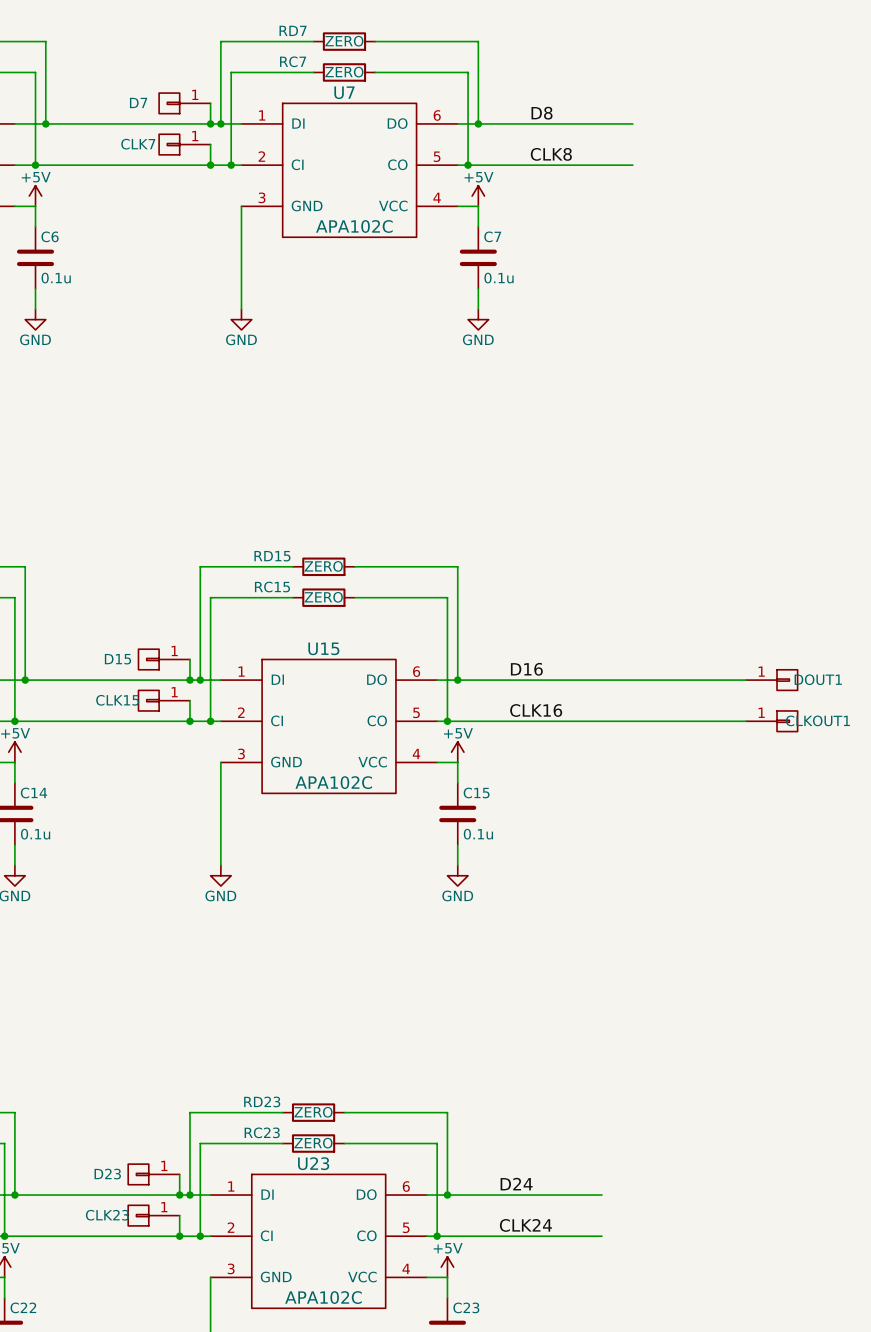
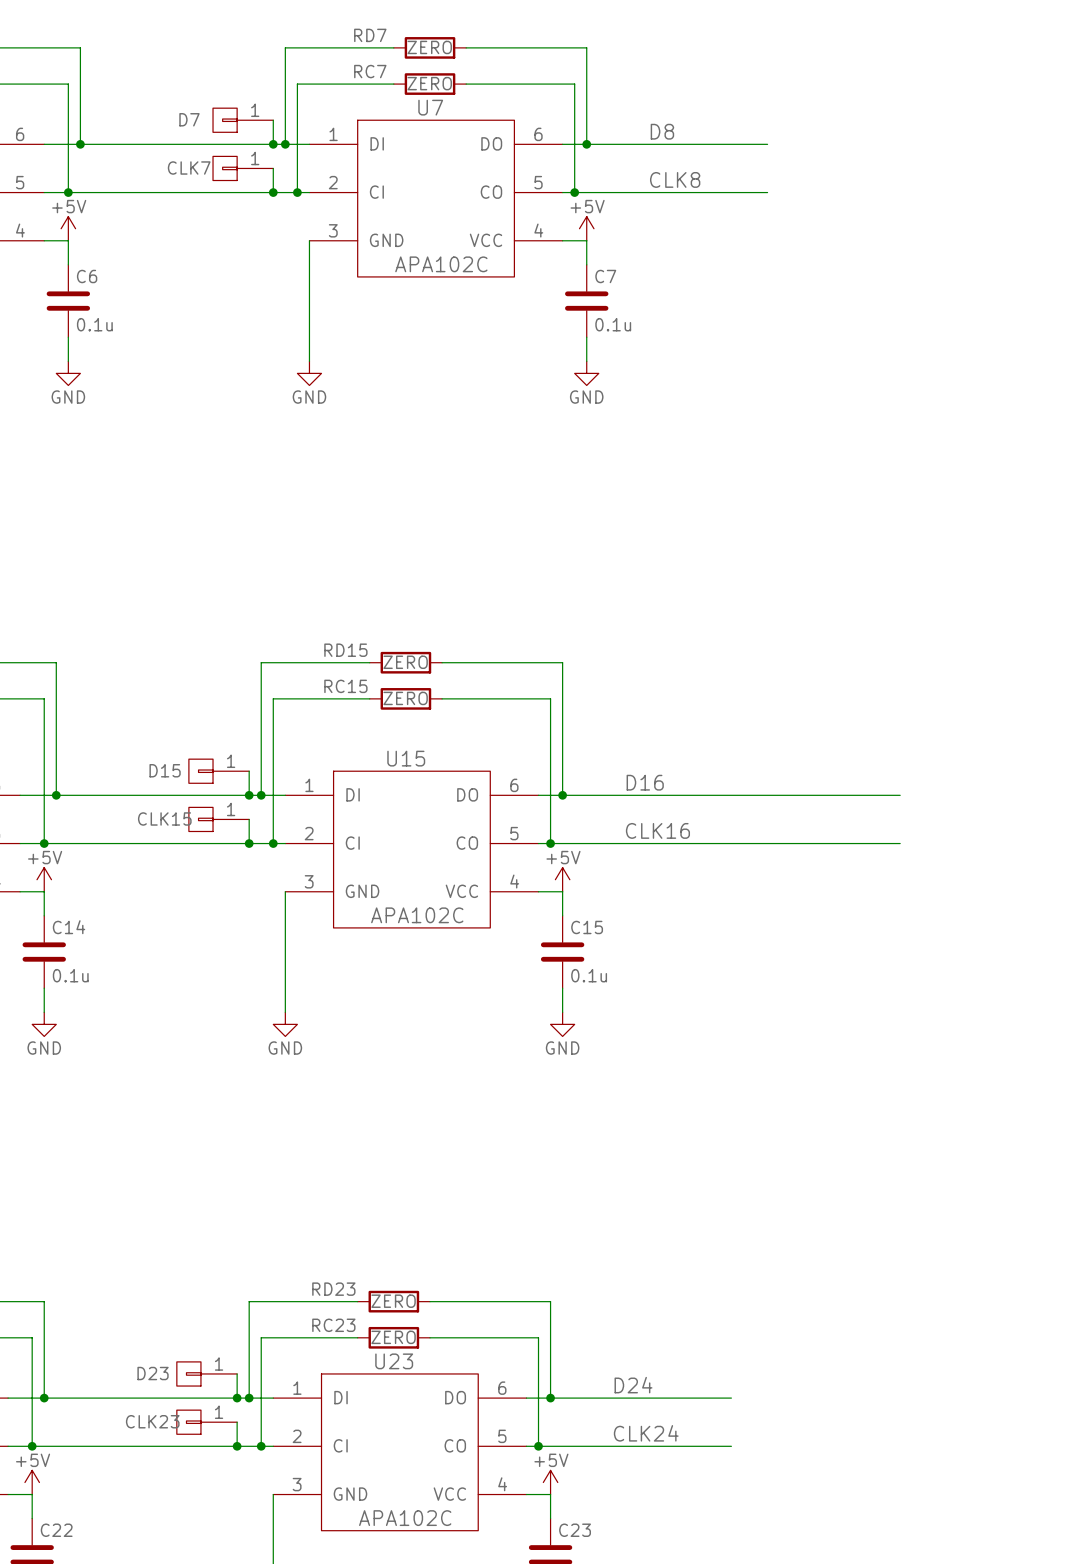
DOUT1: (771, 680) -> none
CLKOUT1: (771, 721) -> none

